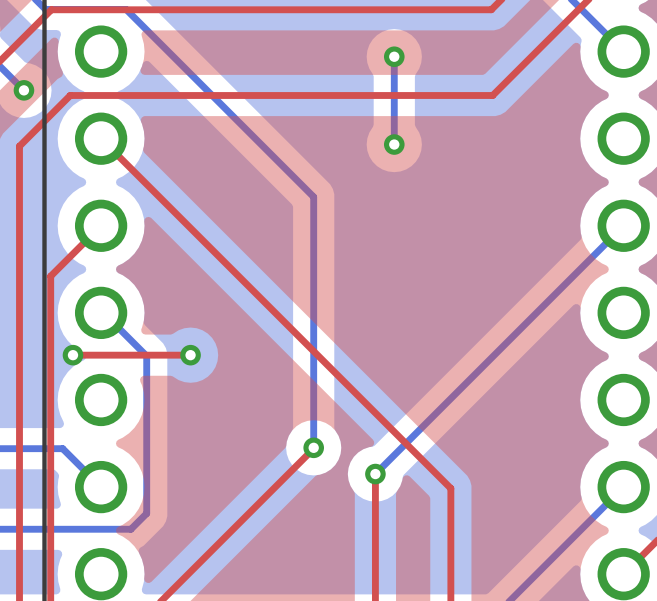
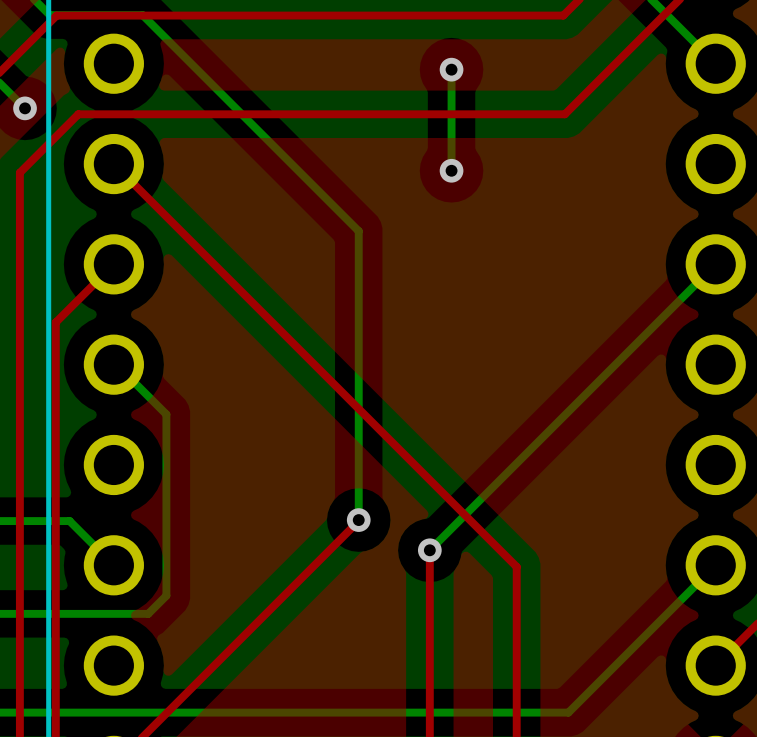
top track: (72, 355) (190, 355) -> none
via: (72, 355) -> none
via: (190, 355) -> none

